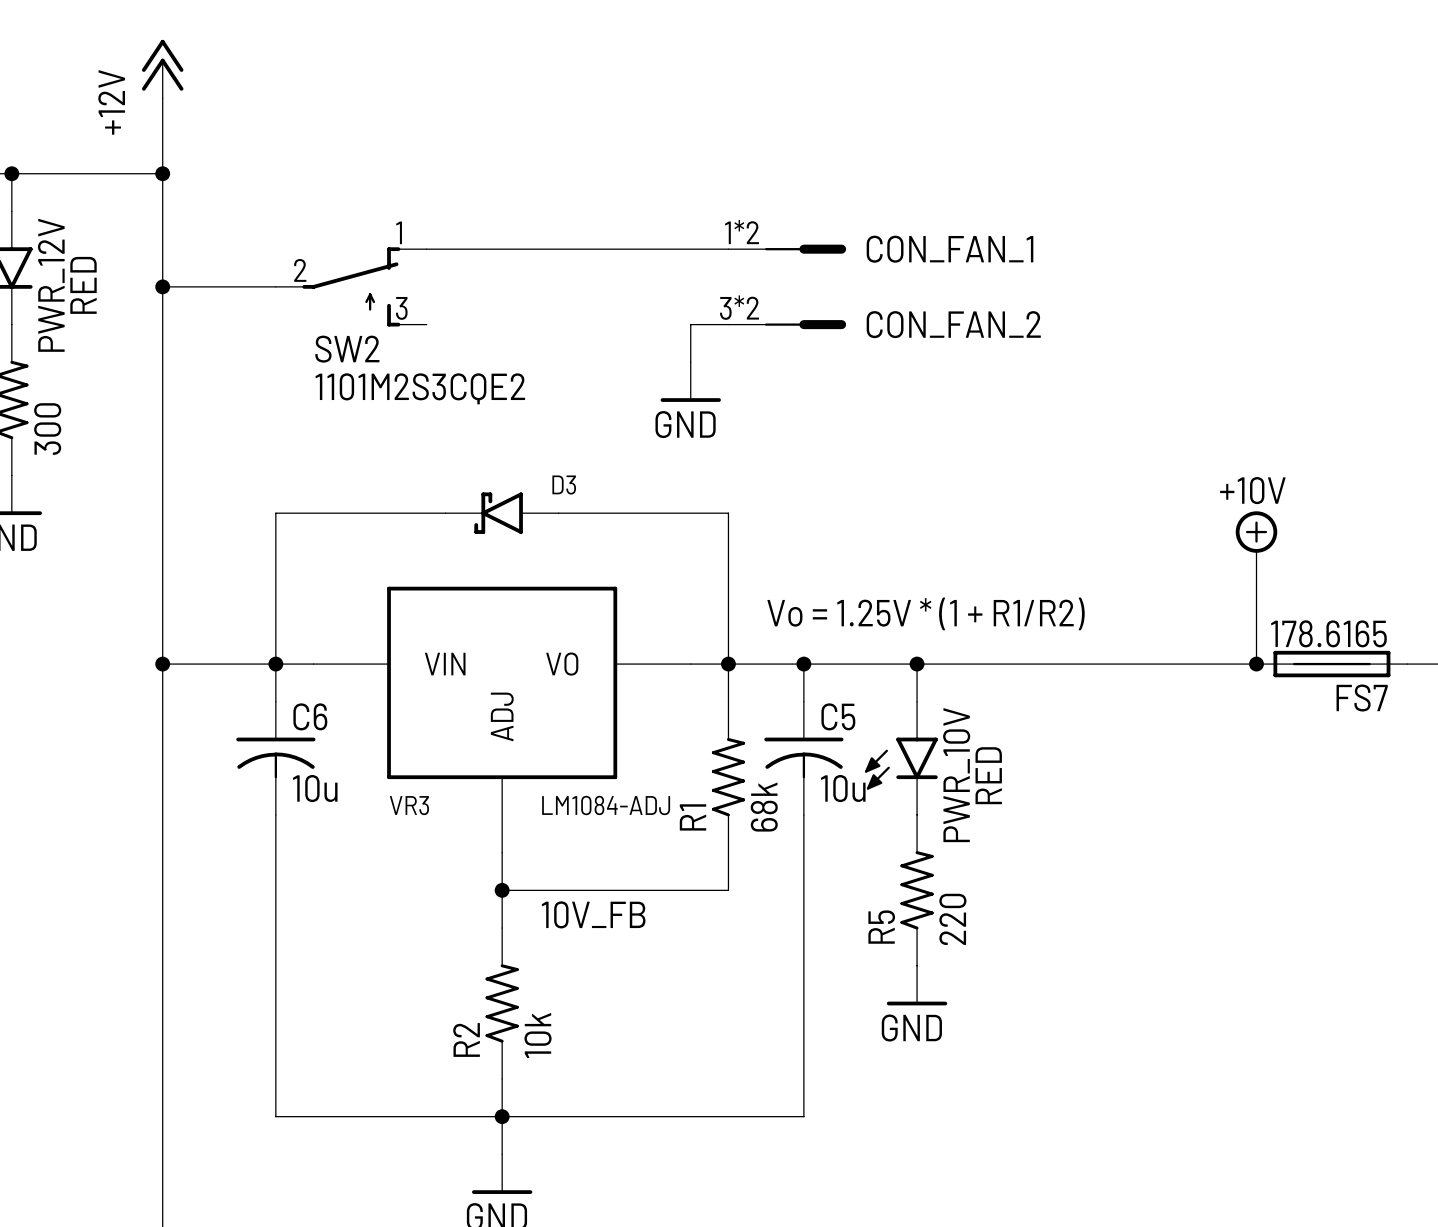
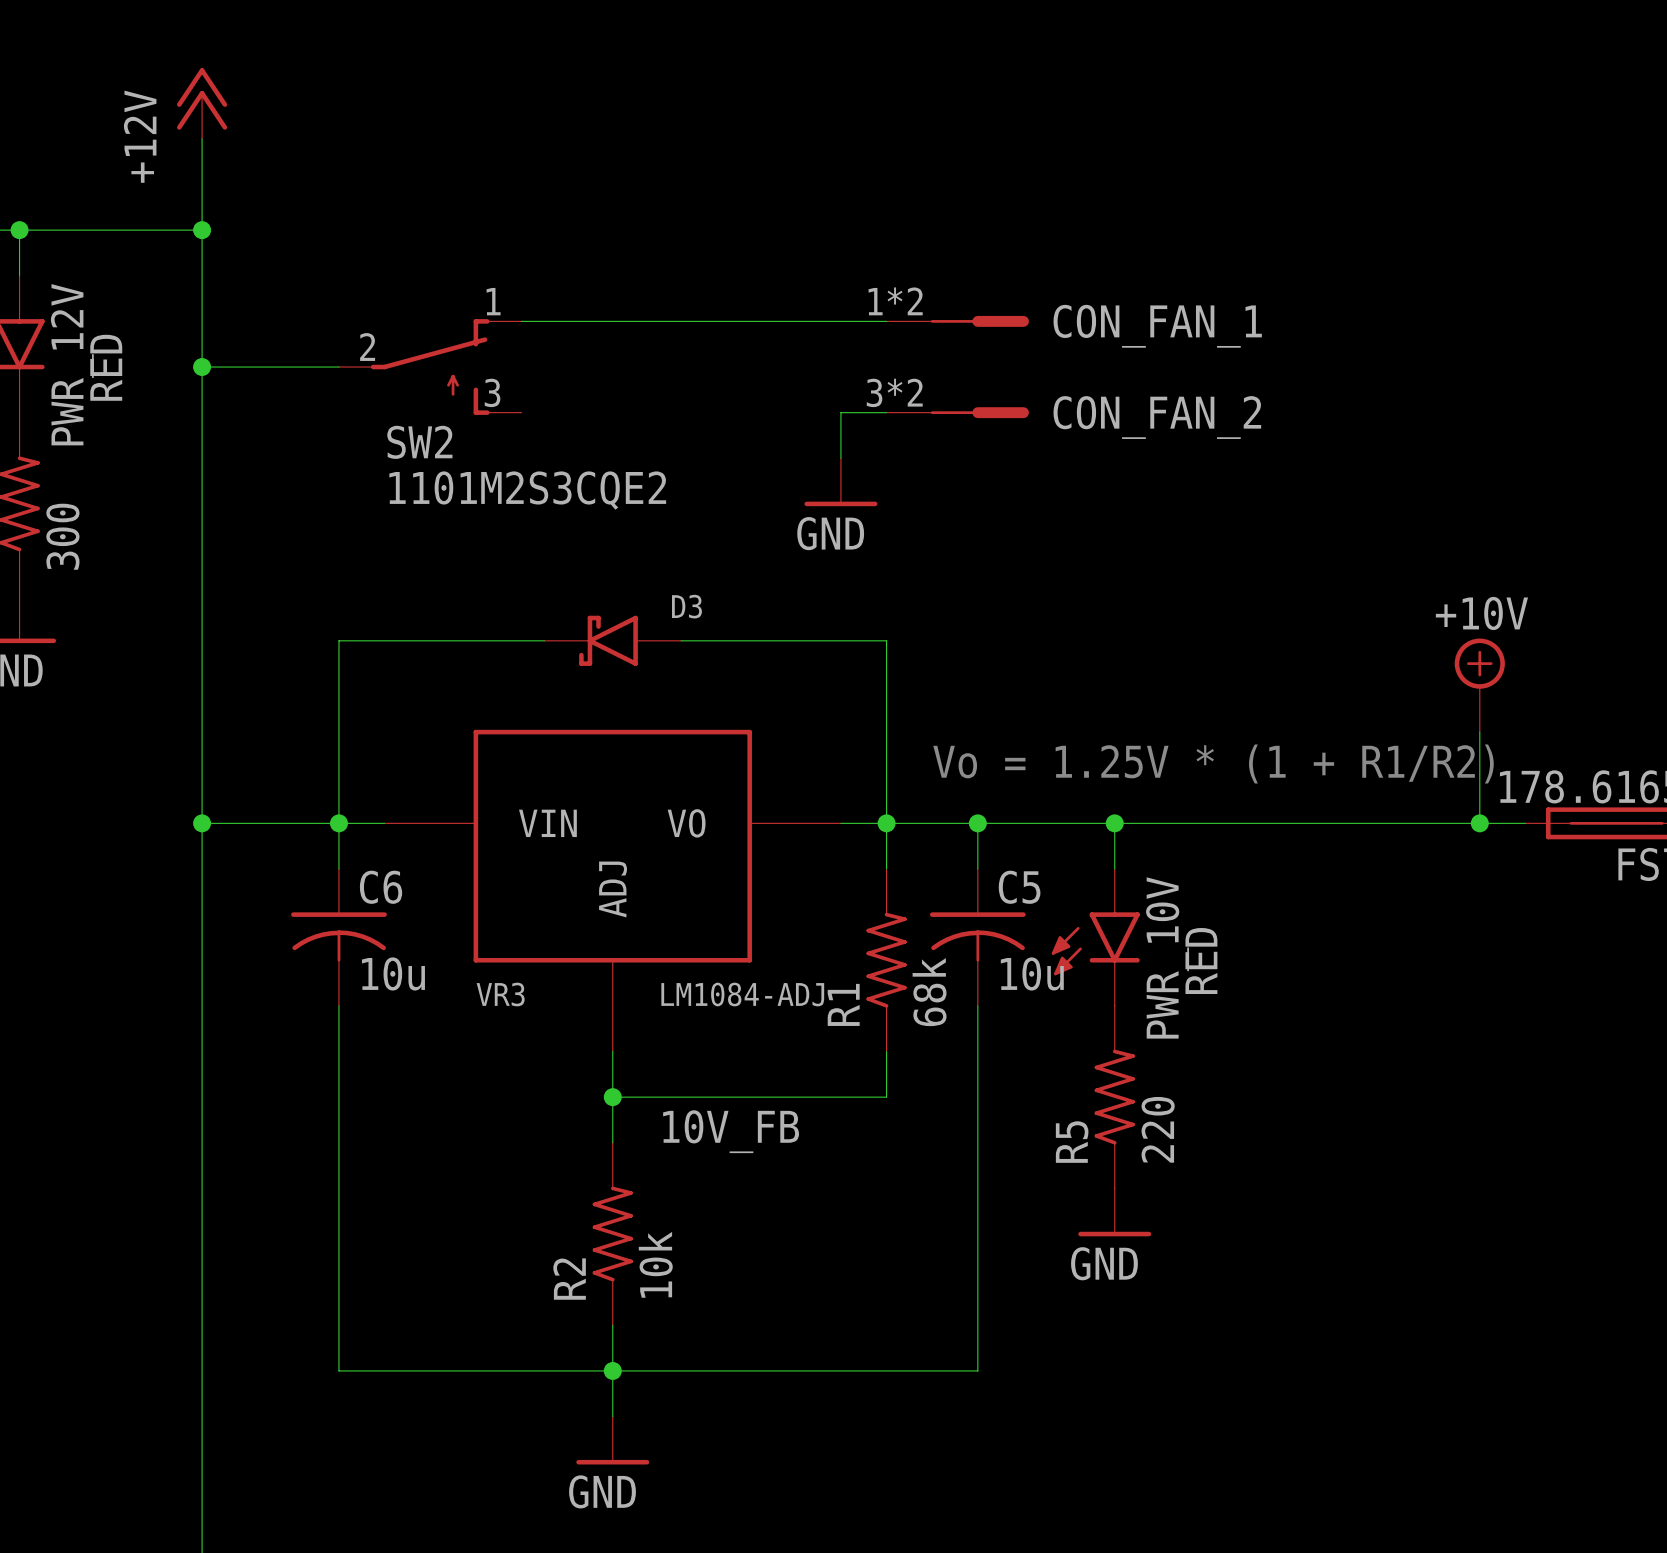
power symbol position: +10V (1256, 549) -> +10V (1479, 685)
wire: (1256, 588) (1256, 664) -> (1479, 732) (1479, 823)
junction position: (1256, 664) -> (1479, 823)

